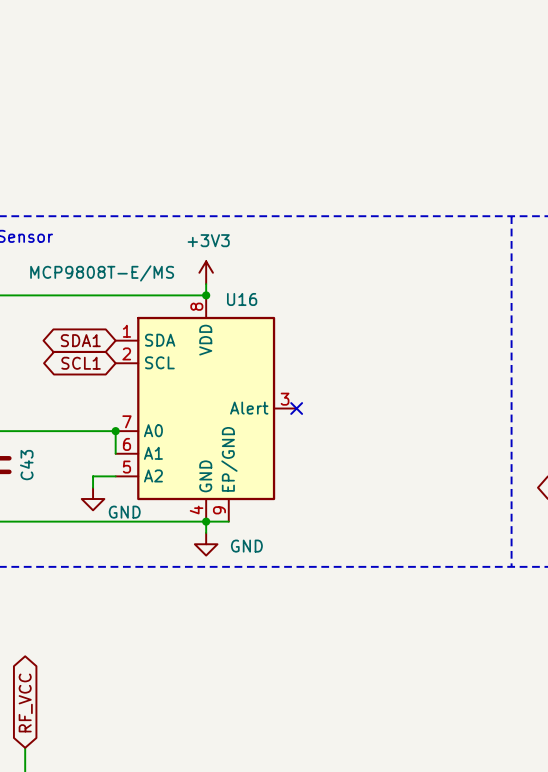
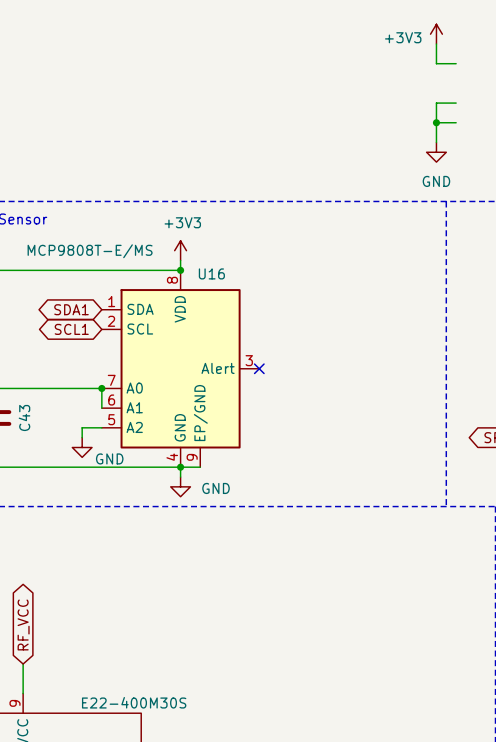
power symbol: none -> +3V3 (436, 34)
wire: none -> (436, 44) (436, 63) (456, 63)
wire: none -> (456, 103) (436, 103) (436, 142)
wire: none -> (436, 122) (456, 122)
junction: none -> (436, 122)
power symbol: none -> GND (436, 152)

